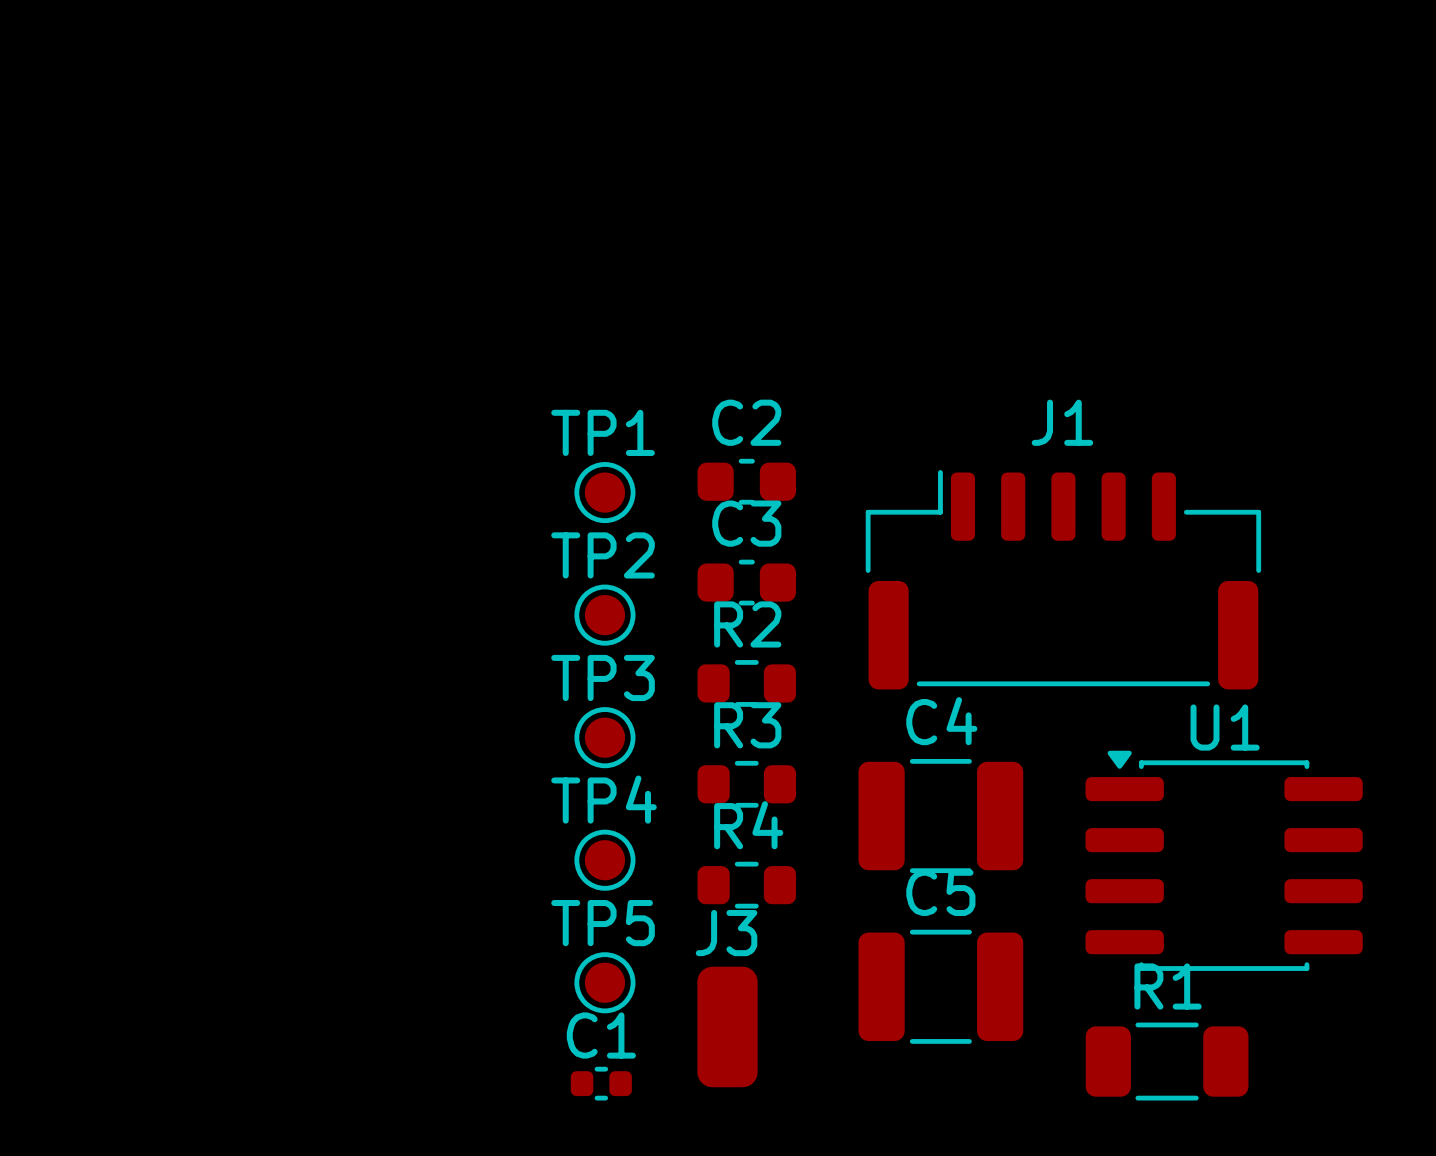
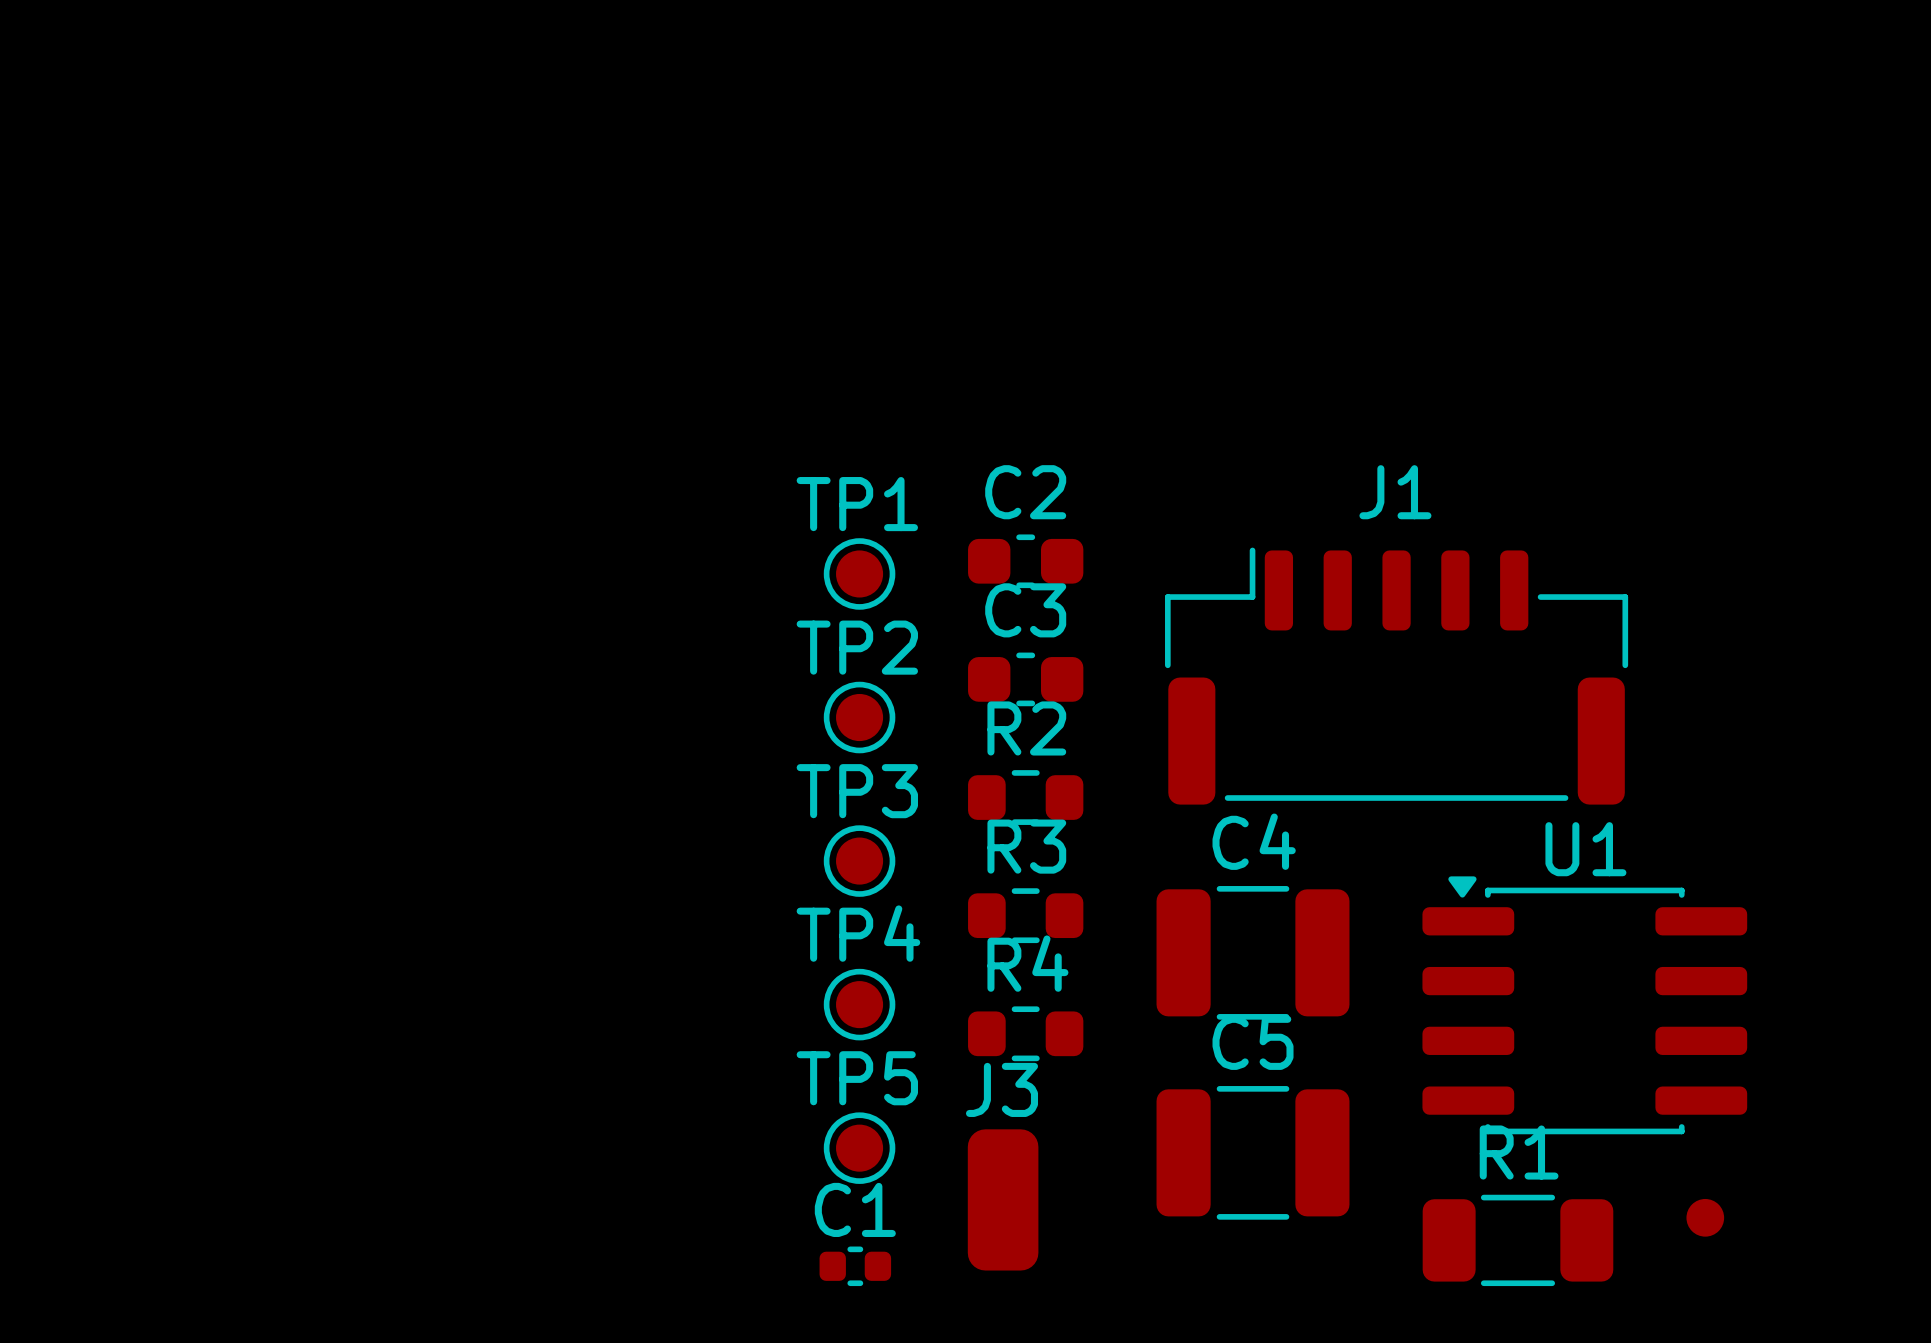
part: none -> (1705, 1217)

